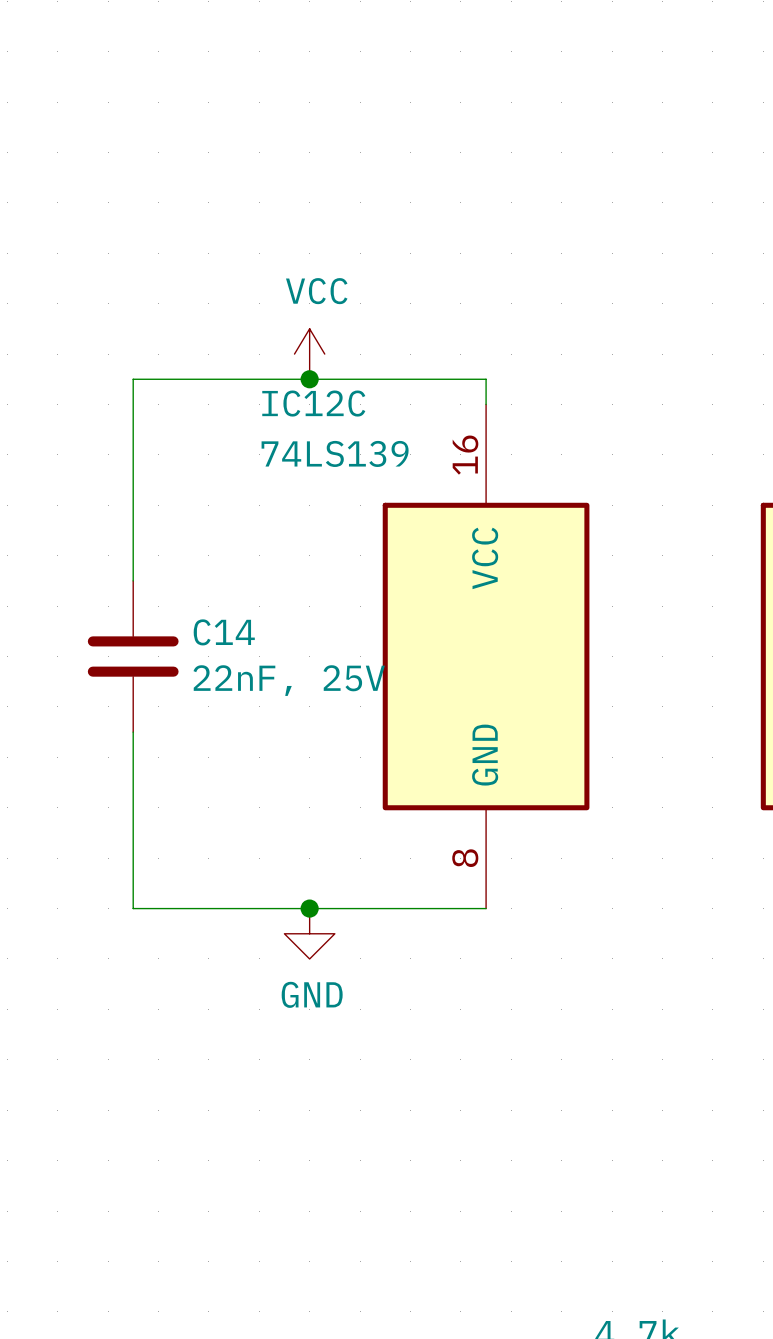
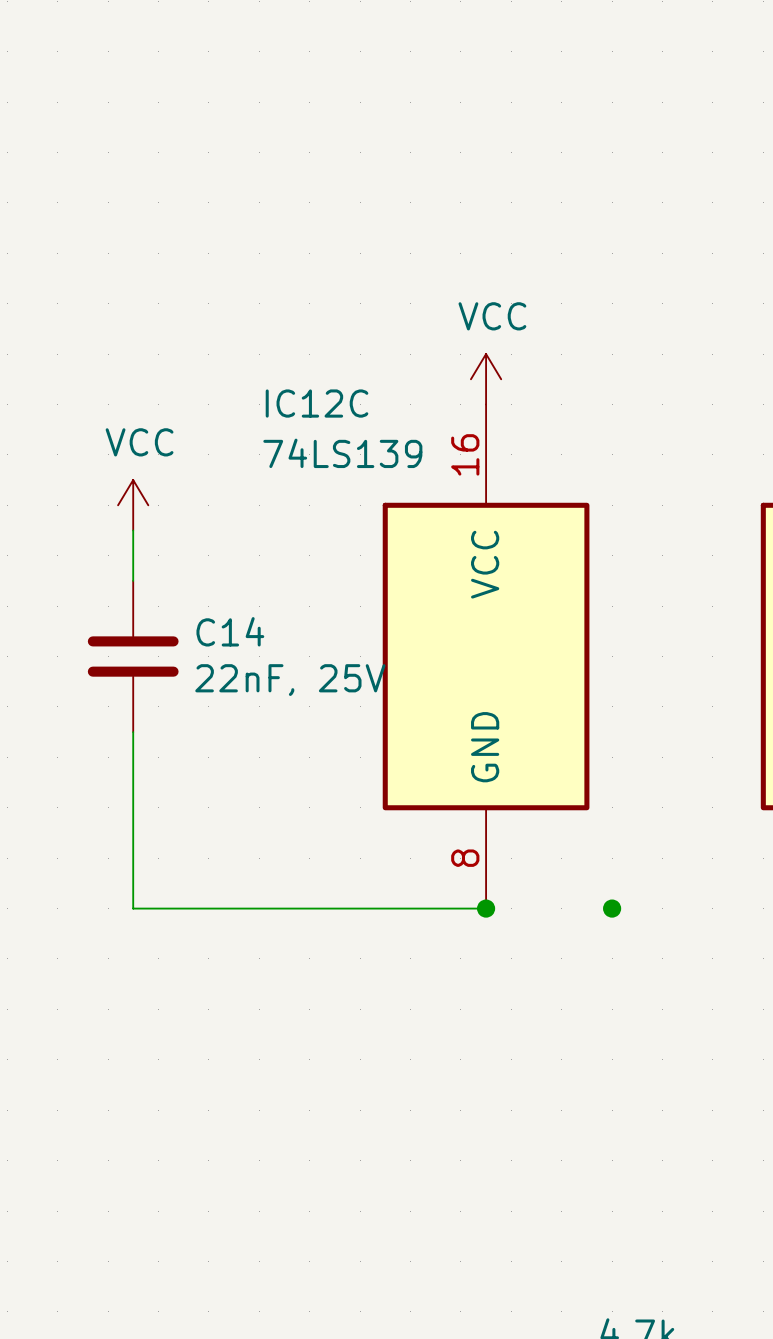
power symbol: VCC (309, 354) -> none
junction: (309, 379) -> none
power symbol: none -> VCC (486, 379)
wire: (486, 404) (486, 379) (133, 379) (133, 530) -> none
power symbol: none -> VCC (133, 505)
junction: (309, 908) -> none
junction: none -> (486, 908)
junction: none -> (612, 908)
power symbol: GND (309, 933) -> none

